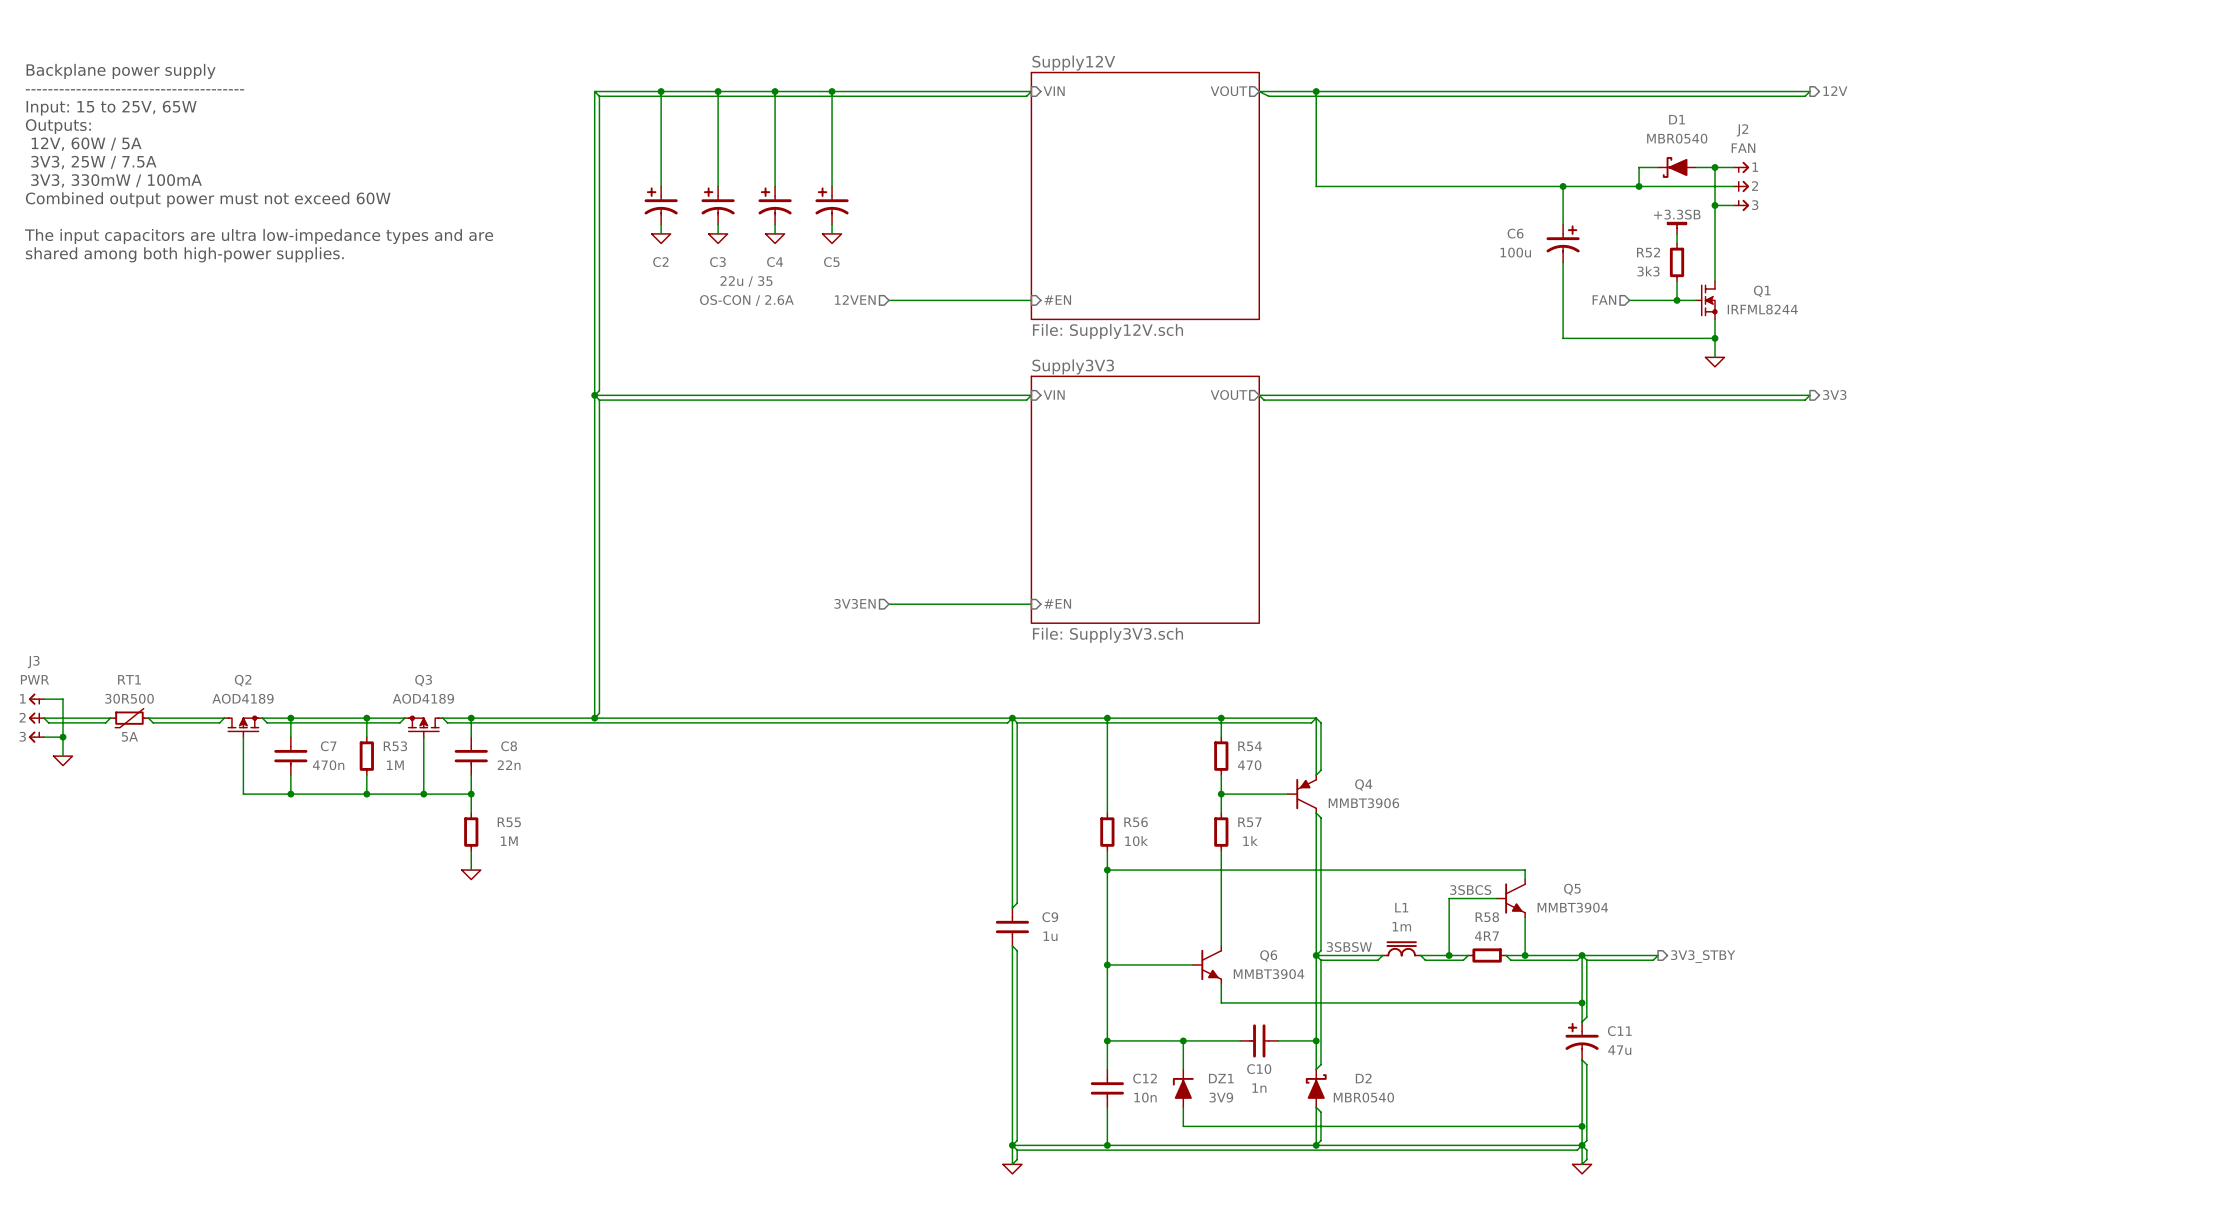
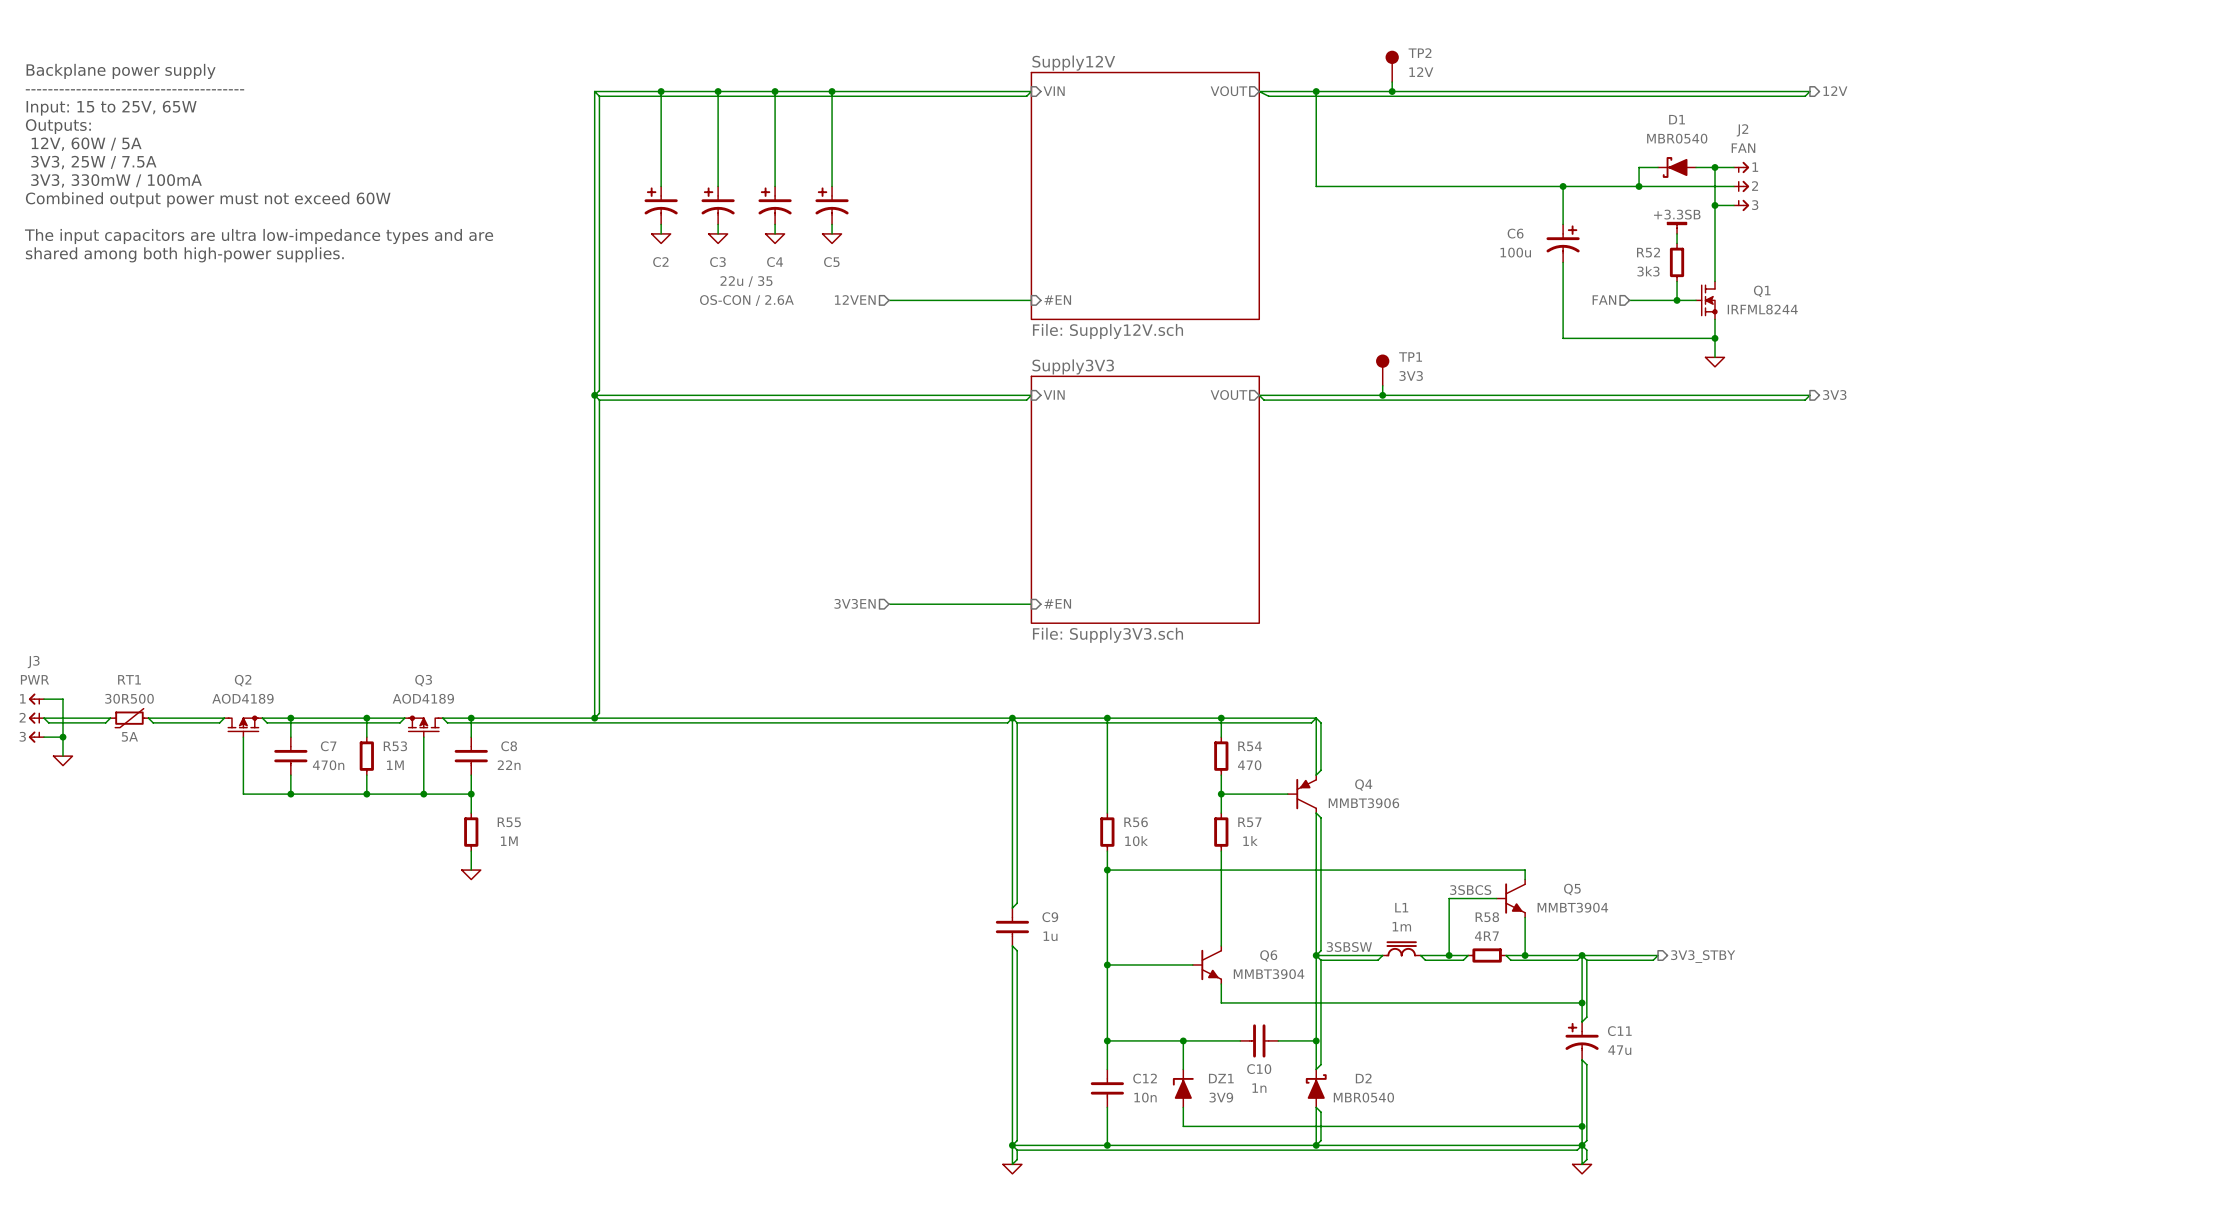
TP2: none -> 12V (1392, 66)
wire: none -> (1392, 82) (1392, 91)
junction: none -> (1392, 91)
TP1: none -> 3V3 (1382, 370)
wire: none -> (1382, 385) (1382, 395)
junction: none -> (1382, 395)

